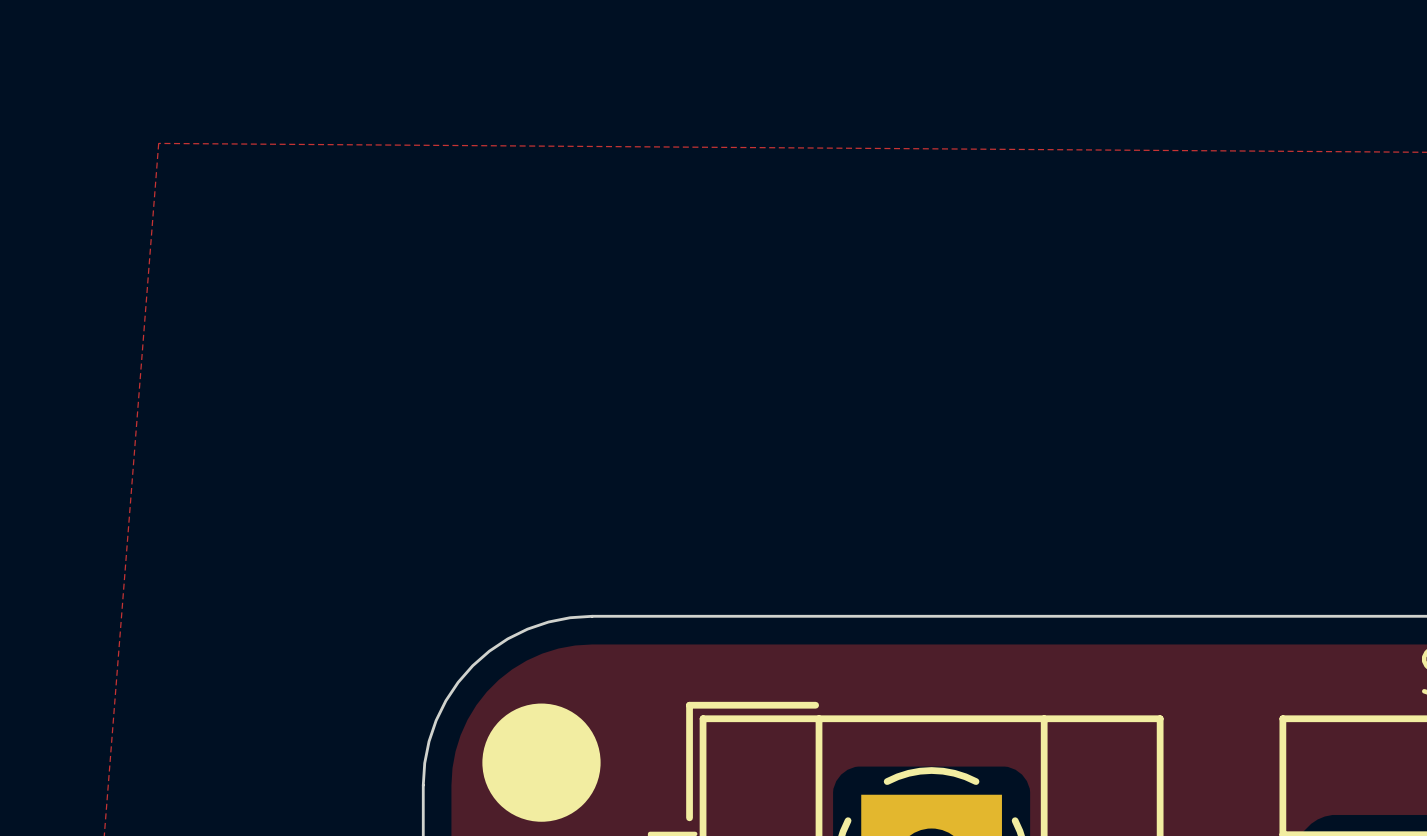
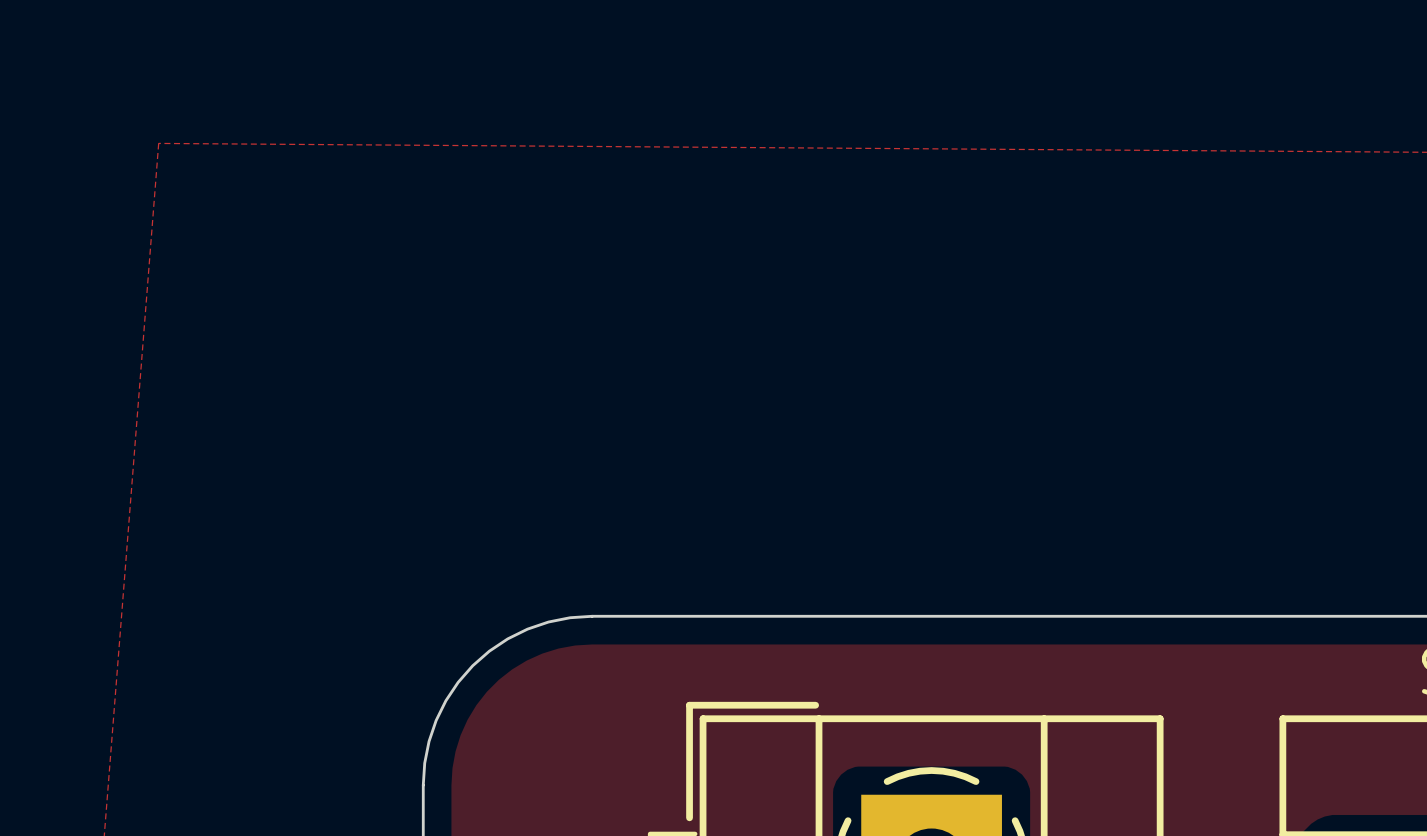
drawing: [482, 703, 601, 822] -> none

